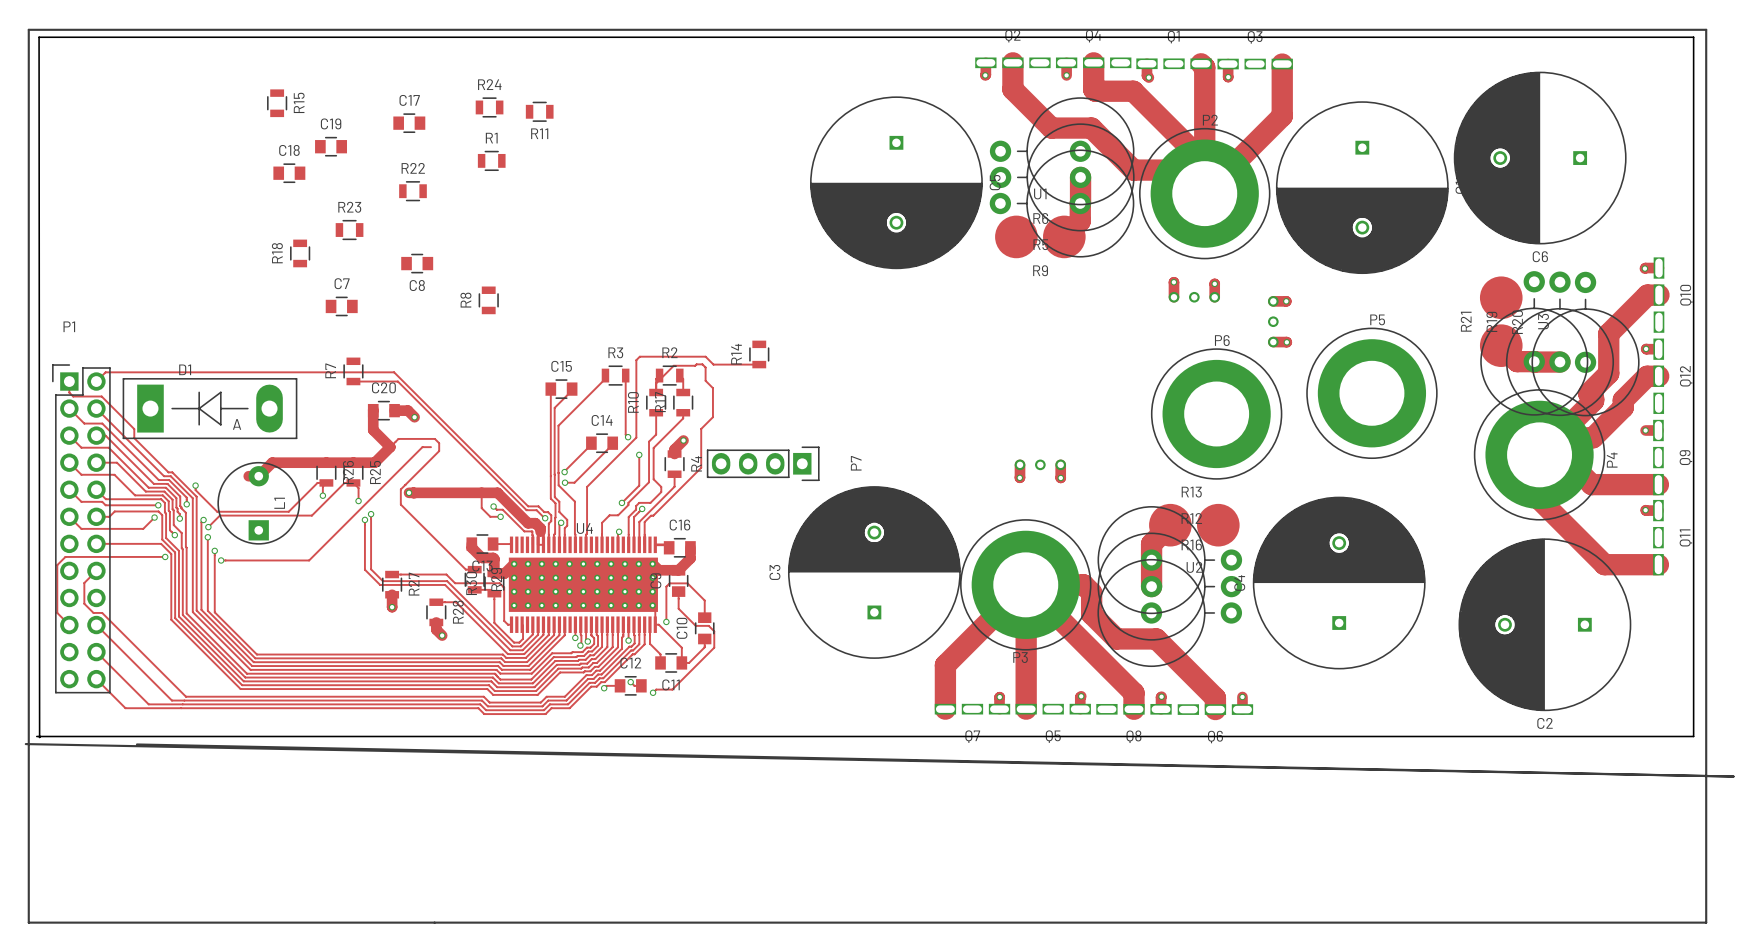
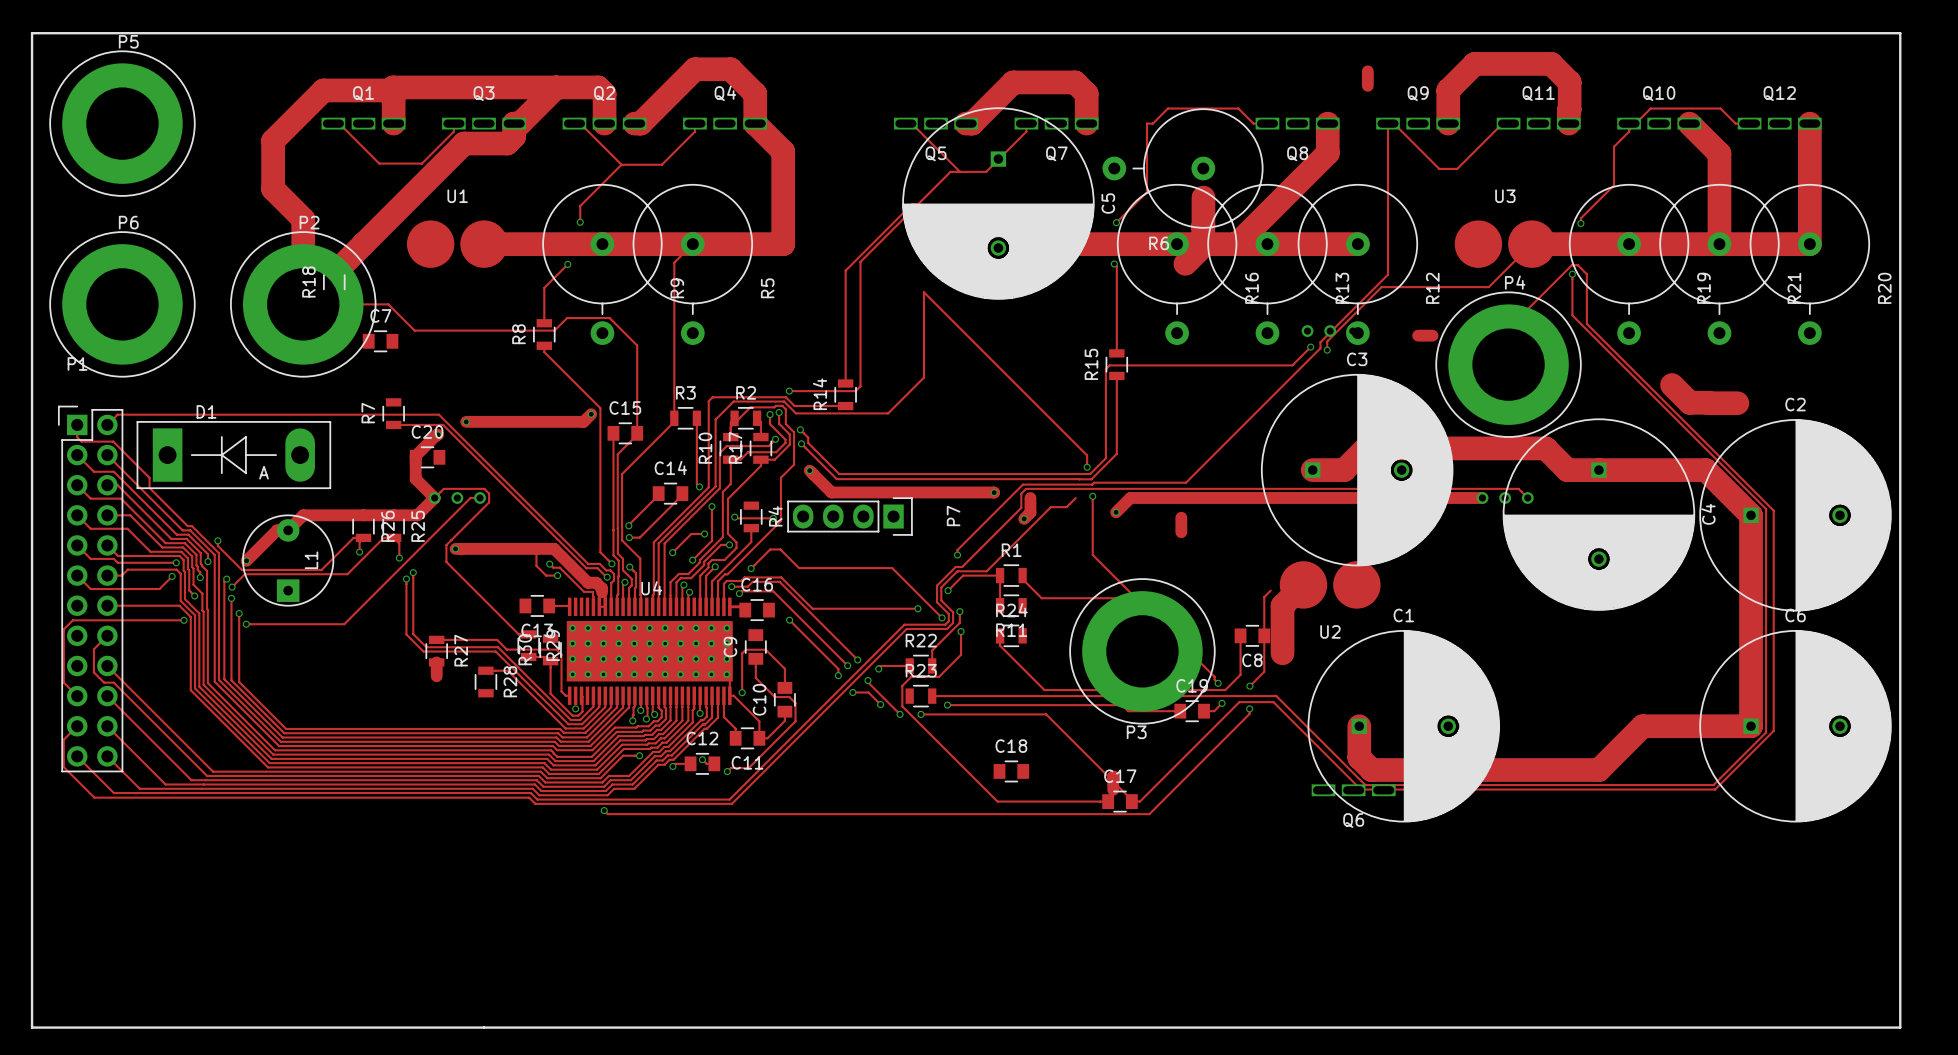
track: (985, 62) (985, 75) -> none
track: (1012, 62) (1012, 89) (1051, 128) (1091, 128) (1133, 170) (1181, 170) (1204, 193) -> none
Q2 position: (1012, 62) -> (604, 123)
track: (1066, 62) (1066, 75) -> none
track: (1093, 62) (1093, 89) (1095, 91) (1133, 91) (1204, 162) -> none
Q4 position: (1093, 62) -> (725, 123)
track: (1152, 63) (1146, 63) (1146, 75) (1148, 77) -> none
Q1 position: (1174, 63) -> (363, 123)
track: (1201, 63) (1204, 67) (1204, 193) -> none
Q3 position: (1255, 64) -> (484, 123)
track: (1282, 64) (1282, 116) (1204, 193) -> none
via: (985, 75) -> none
via: (1066, 75) -> none
via: (1148, 77) -> none
via: (1228, 77) -> none
track: none -> (556, 87) (520, 123) (514, 123) (514, 136) (507, 143) (464, 143) (303, 304)
track: none -> (390, 90) (393, 87) (598, 87) (604, 93) (604, 123)
track: none -> (390, 90) (323, 90) (273, 140) (273, 189) (303, 219) (303, 304)
track: none -> (390, 90) (393, 93) (393, 123)
R15 name position: R15 (299, 102) -> R15 (1091, 364)
R15 position: (277, 103) -> (1116, 364)
R24 position: (489, 107) -> (1011, 635)
track: none -> (333, 123) (339, 123) (379, 163) (422, 163) (453, 131) (453, 123)
track: none -> (574, 123) (580, 123) (621, 164)
track: none -> (634, 123) (640, 123) (694, 69) (730, 69) (755, 93) (755, 123) (783, 151) (783, 244) (484, 244)
track: none -> (694, 123) (694, 131) (661, 164) (621, 164)
track: none -> (905, 123) (911, 123) (960, 171)
track: none -> (966, 123) (972, 123) (1013, 82) (1075, 82) (1086, 93) (1086, 123)
track: none -> (1026, 123) (1026, 131) (986, 171) (950, 171) (918, 204) (912, 204) (845, 270) (845, 383)
track: none -> (1267, 123) (1253, 123) (1238, 108) (1167, 108) (1152, 123) (1146, 123) (1146, 192) (1116, 222)
track: none -> (1327, 123) (1327, 153) (1236, 244)
track: none -> (1448, 123) (1448, 90) (1474, 63) (1551, 63) (1569, 82) (1568, 123)
track: none -> (1508, 123) (1502, 123) (1457, 168) (1439, 168) (1393, 123) (1388, 123) (1388, 274) (1320, 342) (1320, 348) (1186, 482) (1022, 484) (957, 550) (957, 555)
track: none -> (1629, 123) (1629, 131) (1614, 146) (1614, 185) (1580, 218) (1580, 223)
track: none -> (1689, 123) (1719, 153) (1719, 244)
track: none -> (1749, 123) (1735, 123) (1720, 108) (1650, 108) (1629, 130)
track: none -> (1809, 123) (1809, 244) (1531, 244) (1488, 287) (1381, 287) (1327, 341) (1327, 350)
R11 position: (539, 111) -> (1011, 605)
C17 position: (409, 123) -> (1120, 801)
C19 position: (331, 146) -> (1192, 711)
track: none -> (621, 164) (580, 206) (580, 222)
C6 rotation: 0° (1540, 158) -> 180° (1795, 726)
C6 position: (1540, 158) -> (1795, 726)
R1 position: (491, 160) -> (1011, 575)
C18 position: (289, 173) -> (1011, 771)
R5 rotation: 0° (1062, 177) -> 90° counterclockwise (692, 264)
R5 position: (1062, 177) -> (692, 264)
C1 rotation: 0° (1362, 187) -> 90° counterclockwise (1403, 726)
C1 position: (1362, 187) -> (1403, 726)
R22 position: (412, 191) -> (920, 665)
P2 position: (1204, 193) -> (303, 304)
via: none -> (580, 222)
via: none -> (1116, 222)
via: none -> (1580, 223)
R9 rotation: 0° (1062, 203) -> 90° counterclockwise (602, 264)
R9 position: (1062, 203) -> (602, 264)
track: none -> (692, 244) (674, 262) (674, 418)
track: none -> (1357, 244) (1079, 244) (1047, 211) (910, 211) (860, 261) (860, 386) (855, 391) (789, 391)
R23 position: (349, 230) -> (920, 696)
track: none -> (567, 264) (544, 287) (544, 323)
via: none -> (567, 264)
track: none -> (1114, 263) (1116, 266) (1116, 353)
via: none -> (1114, 263)
track: none -> (1572, 274) (1572, 315) (1766, 509) (1766, 732) (1713, 785) (1365, 785) (1276, 696) (932, 696)
via: none -> (1572, 274)
C8 position: (417, 263) -> (1252, 635)
via: (1644, 268) -> none
track: (1658, 268) (1644, 268) -> none
track: none -> (303, 304) (388, 304) (414, 330) (554, 330) (567, 318) (609, 318) (637, 345) (637, 433)
track: (1173, 282) (1173, 297) -> none
via: (1173, 282) -> none
track: (1214, 283) (1214, 297) -> none
via: (1214, 283) -> none
track: (1658, 295) (1647, 295) (1608, 333) (1608, 373) (1588, 393) (1593, 400) (1539, 454) -> none
Q10 rotation: 0° (1658, 295) -> 90° clockwise (1659, 123)
Q10 position: (1658, 295) -> (1659, 123)
Q10 name position: Q10 (1686, 295) -> Q10 (1659, 93)
via: (1286, 301) -> none
track: none -> (544, 345) (544, 352) (600, 408) (600, 552) (611, 563)
track: none -> (1310, 347) (1292, 365) (1109, 365) (1105, 369) (1105, 458) (1090, 474) (839, 474) (808, 443) (808, 437) (800, 429)
via: none -> (1310, 347)
via: none -> (1327, 350)
U3 rotation: 0° (1395, 321) -> 90° counterclockwise (1505, 362)
track: none -> (1508, 364) (1508, 328) (1571, 265) (1577, 265) (1586, 274) (1586, 323) (1773, 510) (1773, 730) (1715, 789) (1360, 789) (1273, 702) (1239, 702) (1139, 801) (1131, 801) (1046, 714) (921, 714)
track: none -> (1116, 375) (1116, 453) (1091, 479) (1079, 479)
U1 position: (1040, 342) -> (457, 362)
track: (1273, 342) (1286, 342) -> none
via: (1286, 342) -> none
R21 rotation: 0° (1534, 343) -> 180° (1719, 264)
R21 position: (1534, 343) -> (1719, 264)
R19 rotation: 0° (1559, 343) -> 180° (1629, 264)
R19 position: (1559, 343) -> (1629, 264)
R20 rotation: 0° (1585, 344) -> 180° (1809, 264)
R20 position: (1585, 344) -> (1809, 264)
track: (1646, 348) (1658, 349) -> none
via: (1646, 348) -> none
via: none -> (789, 391)
track: none -> (779, 412) (779, 423) (789, 434) (789, 444) (774, 459) (760, 459)
via: none -> (779, 412)
track: none -> (591, 414) (583, 421) (466, 421)
via: none -> (591, 414)
track: none -> (770, 414) (770, 424) (785, 439) (785, 442) (776, 452) (748, 452) (740, 459) (730, 459)
via: none -> (770, 414)
track: (1658, 376) (1647, 376) (1623, 400) (1623, 407) (1592, 437) (1556, 437) -> none
Q12 rotation: 0° (1658, 376) -> 90° clockwise (1779, 123)
Q12 position: (1658, 376) -> (1779, 123)
Q12 name position: Q12 (1686, 376) -> Q12 (1779, 93)
via: none -> (466, 421)
via: none -> (800, 429)
track: none -> (438, 434) (415, 455)
via: none -> (438, 434)
P5 position: (1371, 393) -> (122, 123)
track: none -> (775, 439) (768, 446) (726, 446) (719, 452) (719, 488) (664, 543) (664, 606)
via: none -> (775, 439)
track: none -> (801, 443) (836, 479) (1079, 479)
via: none -> (801, 443)
track: (394, 410) (407, 410) (414, 417) -> none
P6 position: (1216, 413) -> (122, 304)
via: (414, 417) -> none
track: none -> (1087, 467) (1087, 455) (923, 292) (923, 377) (888, 413) (795, 413) (784, 401) (733, 401) (715, 419) (715, 486) (658, 543) (658, 606)
via: none -> (1087, 467)
track: none -> (809, 470) (831, 492) (994, 492)
via: none -> (809, 470)
track: none -> (1312, 470) (1344, 470) (1365, 448) (1545, 448) (1567, 470) (1705, 470) (1751, 515) (1751, 726) (1642, 726) (1598, 770) (1371, 770) (1359, 757) (1359, 726)
track: (1645, 430) (1658, 430) -> none
via: (1645, 430) -> none
track: (683, 440) (674, 449) (674, 454) -> none
via: (683, 440) -> none
via: none -> (994, 492)
track: none -> (1092, 496) (1092, 554) (1214, 676) (1218, 683)
via: none -> (1092, 496)
track: none -> (1030, 498) (1030, 512) (1024, 518)
track: none -> (1075, 498) (1066, 507) (1050, 507) (986, 571) (957, 571) (941, 587) (941, 600) (953, 612) (953, 622) (947, 628) (906, 628) (731, 803) (535, 803) (529, 797) (94, 797) (63, 767) (63, 739) (77, 726)
track: none -> (1482, 498) (1130, 498) (1116, 512)
track: none -> (1527, 498) (1518, 488) (1026, 488) (1021, 493) (1021, 507) (962, 567) (955, 567) (937, 585) (937, 602) (948, 614) (948, 621) (945, 624) (904, 624) (729, 799) (537, 799) (529, 793) (113, 793) (77, 756)
track: (1539, 454) (1562, 454) (1591, 484) (1658, 484) -> none
track: (1539, 454) (1539, 499) (1604, 564) (1658, 564) -> none
P4 position: (1539, 454) -> (1508, 364)
Q9 rotation: 0° (1658, 457) -> 90° clockwise (1418, 123)
Q9 position: (1658, 457) -> (1418, 123)
Q9 name position: Q9 (1685, 457) -> Q9 (1418, 93)
via: none -> (1116, 512)
P4 name rotation: 0° (1612, 460) -> 90° clockwise (1515, 282)
P4 name position: P4 (1612, 460) -> P4 (1515, 282)
track: none -> (734, 517) (773, 518)
via: none -> (734, 517)
track: (1020, 464) (1019, 477) -> none
via: none -> (773, 518)
via: none -> (1024, 518)
track: none -> (277, 530) (246, 560)
via: (1019, 477) -> none
via: (1060, 477) -> none
track: none -> (704, 534) (691, 534) (672, 552)
via: none -> (704, 534)
track: none -> (729, 544) (721, 544) (691, 578) (680, 578) (676, 582) (676, 606)
via: none -> (729, 544)
via: none -> (672, 552)
via: none -> (957, 555)
via: none -> (246, 560)
via: none -> (611, 563)
track: none -> (629, 567) (636, 573) (634, 606)
via: none -> (629, 567)
track: none -> (751, 568) (770, 549) (780, 549) (799, 568) (892, 568) (942, 617)
via: none -> (751, 568)
track: (1645, 510) (1658, 510) -> none
via: (1645, 510) -> none
track: none -> (1022, 575) (1022, 579) (1041, 598) (1116, 598)
track: none -> (683, 584) (682, 606)
via: none -> (683, 584)
track: none -> (731, 586) (747, 586) (752, 581) (779, 581) (857, 659)
via: none -> (731, 586)
track: none -> (948, 590) (963, 575) (1000, 575) (1000, 605)
via: none -> (948, 590)
track: none -> (1270, 590) (1264, 597) (1264, 671) (1249, 686)
track: none -> (739, 593) (741, 591) (773, 591) (847, 665)
via: none -> (739, 593)
Q11 rotation: 0° (1658, 537) -> 90° clockwise (1538, 123)
Q11 position: (1658, 537) -> (1538, 123)
Q11 name position: Q11 (1685, 537) -> Q11 (1538, 93)
track: (471, 544) (471, 547) (481, 557) (494, 559) (494, 573) (504, 573) (514, 563) -> none
track: none -> (723, 606) (723, 583) (726, 581) (741, 581) (744, 577) (781, 577) (812, 608) (917, 608)
via: none -> (917, 608)
track: (690, 547) (690, 558) (678, 570) (658, 570) (652, 563) -> none
track: none -> (959, 611) (959, 622) (932, 650) (932, 665)
via: none -> (959, 611)
via: none -> (942, 617)
track: none -> (789, 620) (838, 669) (838, 675)
via: none -> (789, 620)
R13 rotation: 0° (1169, 560) -> 90° clockwise (1267, 264)
R13 position: (1169, 560) -> (1267, 264)
track: none -> (961, 631) (961, 654) (938, 676) (911, 676) (902, 685) (902, 706) (997, 801) (1108, 801)
via: none -> (961, 631)
track: none -> (1000, 635) (1000, 645) (1044, 690) (1225, 690) (1240, 674) (1240, 635)
C3 rotation: 0° (874, 572) -> 90° clockwise (1357, 470)
C3 position: (874, 572) -> (1357, 470)
C4 rotation: 0° (1339, 583) -> 180° (1598, 514)
C4 position: (1339, 583) -> (1598, 514)
track: (1025, 584) (1083, 584) (1091, 592) (1091, 614) (1116, 638) (1156, 638) (1215, 698) (1215, 709) -> none
track: (1025, 584) (1133, 693) (1133, 709) -> none
track: (1025, 584) (945, 665) (945, 709) -> none
track: (1026, 585) (1026, 709) -> none
R12 rotation: 0° (1169, 586) -> 90° clockwise (1357, 264)
R12 position: (1169, 586) -> (1357, 264)
via: none -> (857, 659)
track: none -> (107, 665) (213, 771) (540, 771) (547, 778) (600, 778) (623, 755) (639, 755)
via: none -> (847, 665)
track: none -> (909, 665) (878, 665) (878, 669)
via: none -> (878, 669)
via: none -> (838, 675)
via: (392, 607) -> none
track: none -> (868, 680) (900, 714)
via: none -> (868, 680)
R16 rotation: 0° (1169, 612) -> 90° clockwise (1177, 264)
R16 position: (1169, 612) -> (1177, 264)
via: none -> (1218, 683)
via: none -> (1249, 686)
track: none -> (852, 692) (868, 692) (880, 704)
via: none -> (852, 692)
track: (436, 622) (436, 629) (442, 635) -> none
track: none -> (634, 695) (632, 720)
C2 rotation: 0° (1544, 624) -> 180° (1795, 515)
C2 position: (1544, 624) -> (1795, 515)
track: none -> (1222, 703) (1214, 711) (1204, 711)
via: none -> (1222, 703)
via: none -> (880, 704)
track: none -> (947, 705) (1122, 705) (1128, 711) (1180, 711)
via: none -> (947, 705)
via: (442, 635) -> none
via: none -> (575, 708)
track: none -> (1249, 708) (1249, 713) (1149, 814) (607, 814) (604, 810)
via: none -> (1249, 708)
via: none -> (900, 714)
via: none -> (921, 714)
via: none -> (632, 720)
via: none -> (639, 755)
track: (1081, 696) (1080, 709) -> none
via: (1081, 696) -> none
track: (1161, 696) (1161, 709) -> none
via: (1161, 696) -> none
track: (1242, 696) (1242, 709) -> none
via: (1242, 696) -> none
via: (999, 697) -> none
Q7 position: (972, 709) -> (1056, 123)
Q5 position: (1053, 709) -> (936, 123)
Q8 position: (1133, 709) -> (1297, 123)
via: none -> (604, 810)
board edge: (36, 736) (1693, 736) (1693, 37) (39, 37) (39, 737) (39, 736) -> none
line: (25, 744) (1733, 776) (137, 744) -> none

